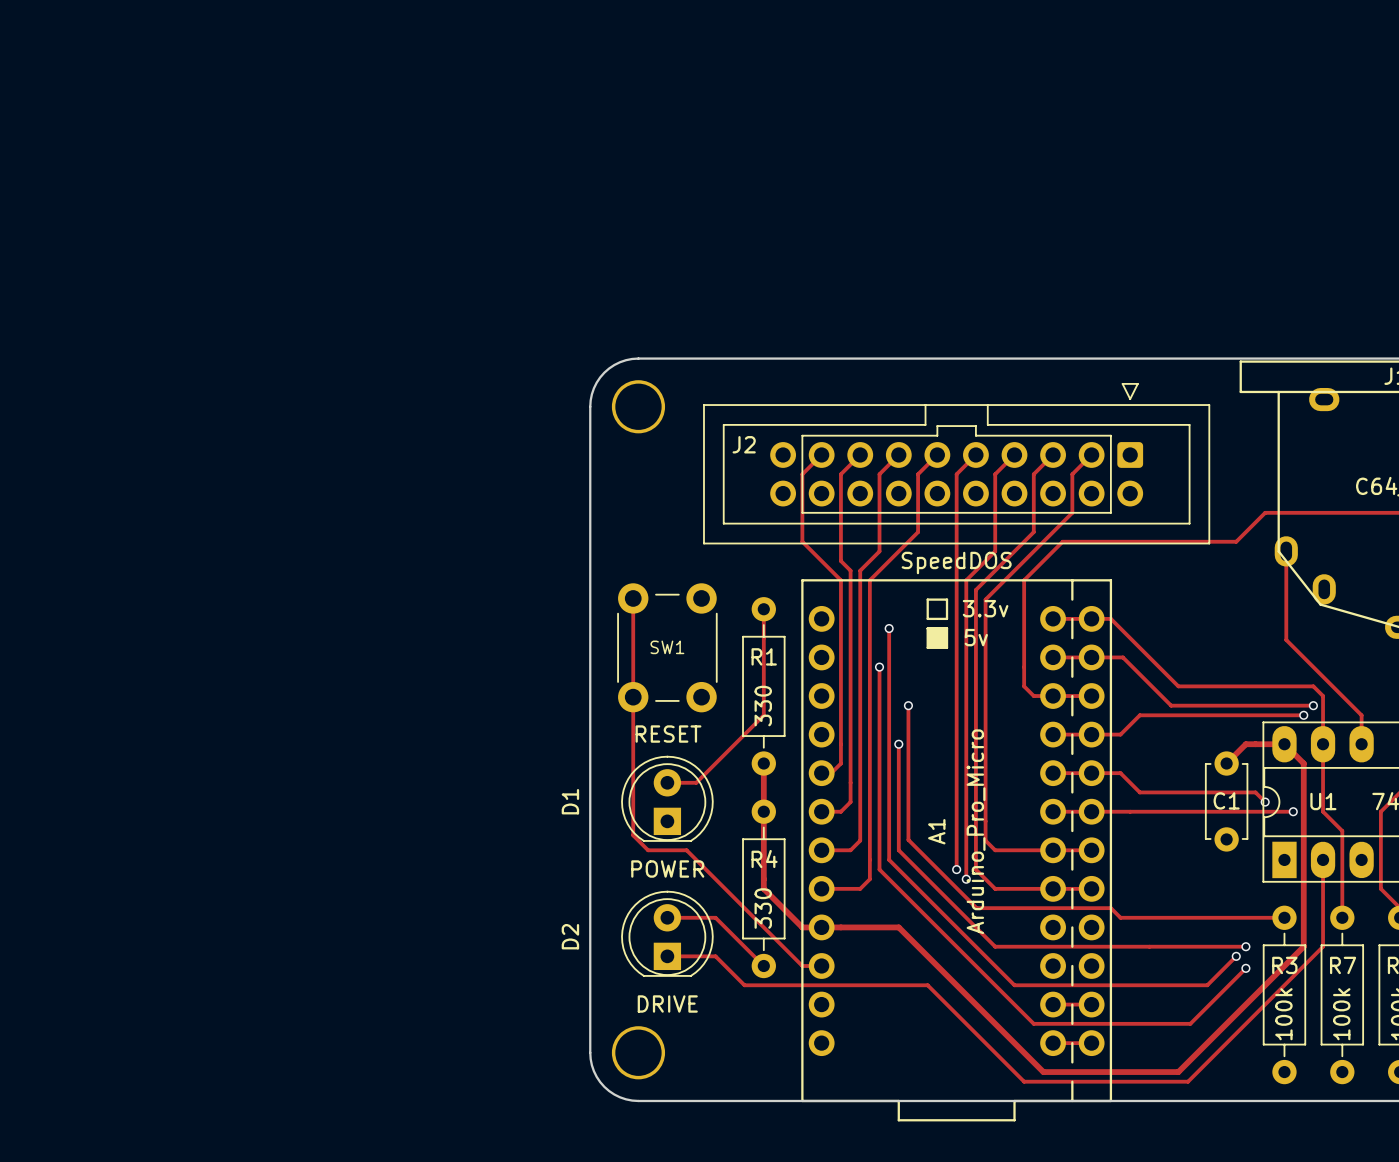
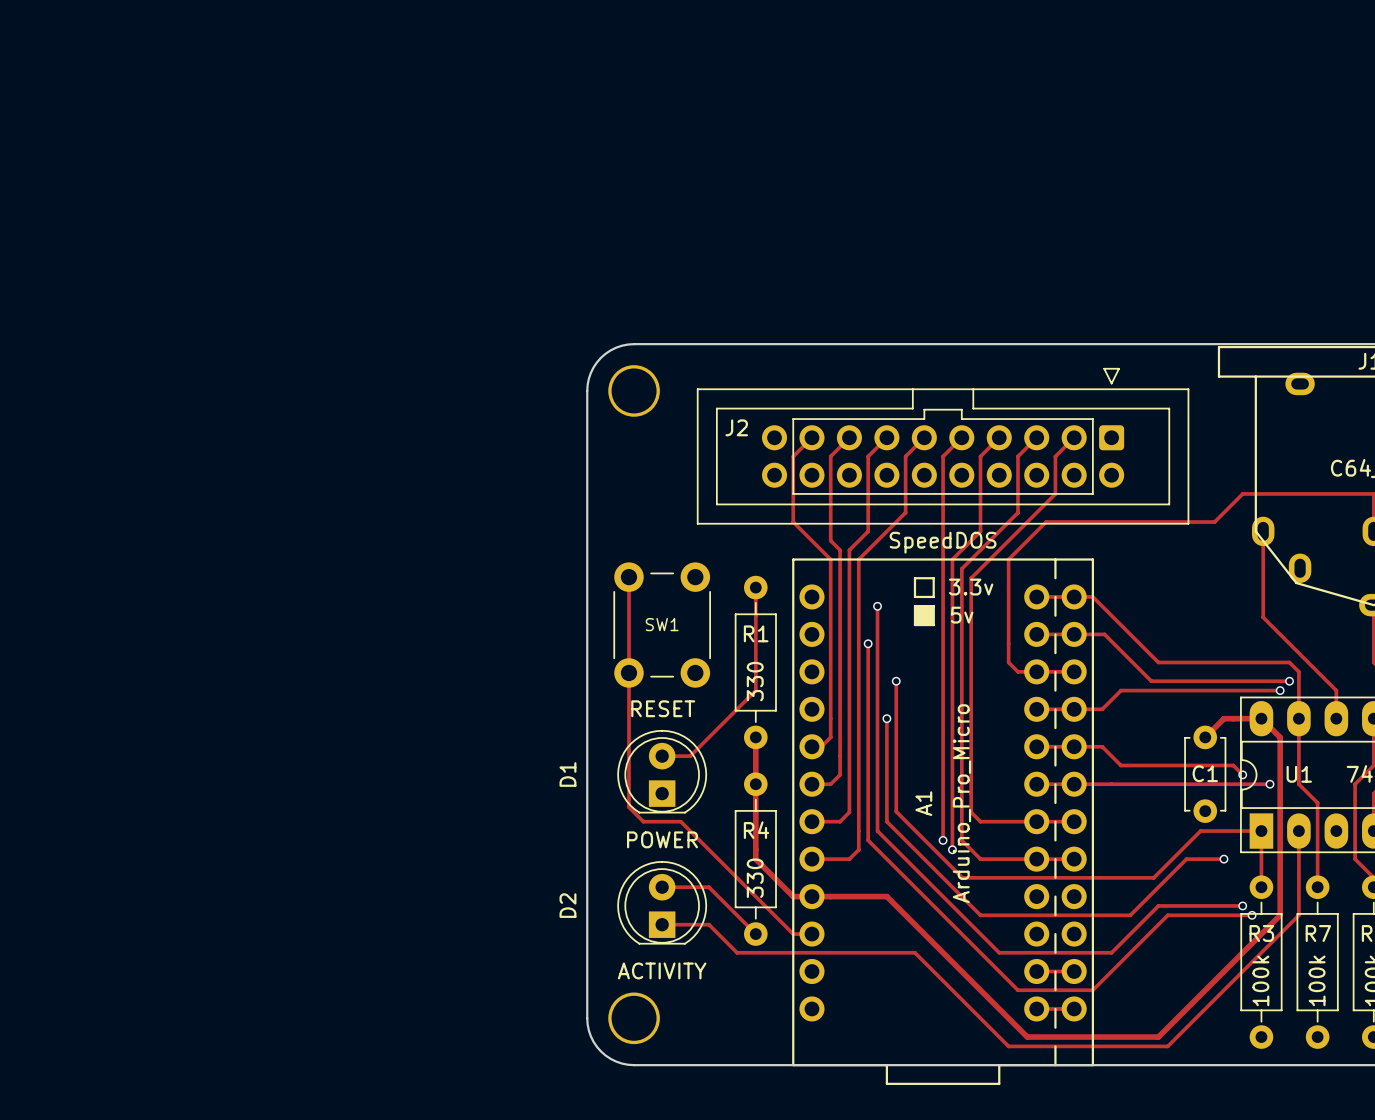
via: none -> (1223, 859)
track: (1110, 908) (1120, 917) (1284, 917) -> (1092, 877) (1153, 877) (1200, 831) (1261, 831) (1261, 887)
via: none -> (1242, 905)
track: (1149, 946) (1188, 946) -> (1130, 915) (1186, 859) (1223, 859)
track: none -> (1223, 915) (1252, 915)
via: (1245, 946) -> none
via: none -> (1252, 915)
track: (1236, 956) (1207, 985) (1130, 985) -> (1242, 905) (1158, 905) (1111, 952)
via: (1236, 956) -> none
track: (1245, 968) (1190, 1023) (1110, 1023) -> (1167, 915) (1092, 990)
via: (1245, 968) -> none
D2 value: DRIVE (667, 1003) -> ACTIVITY (662, 970)

